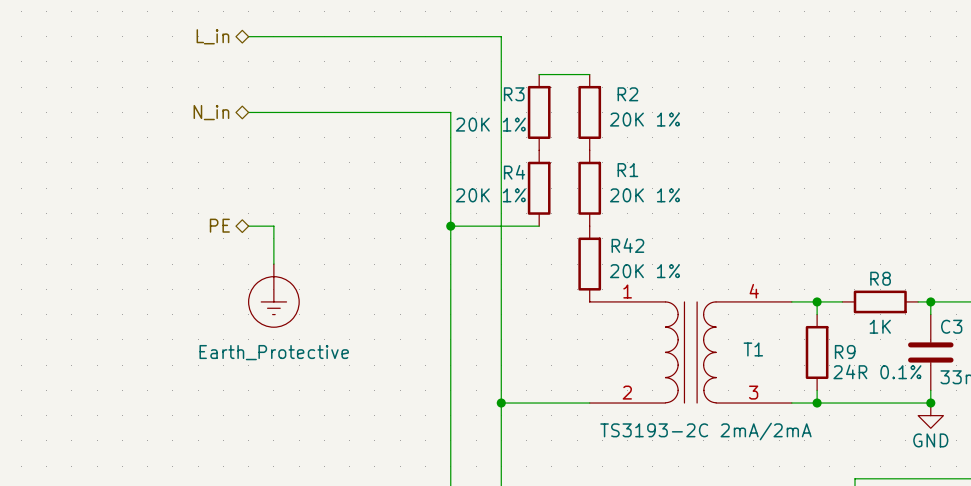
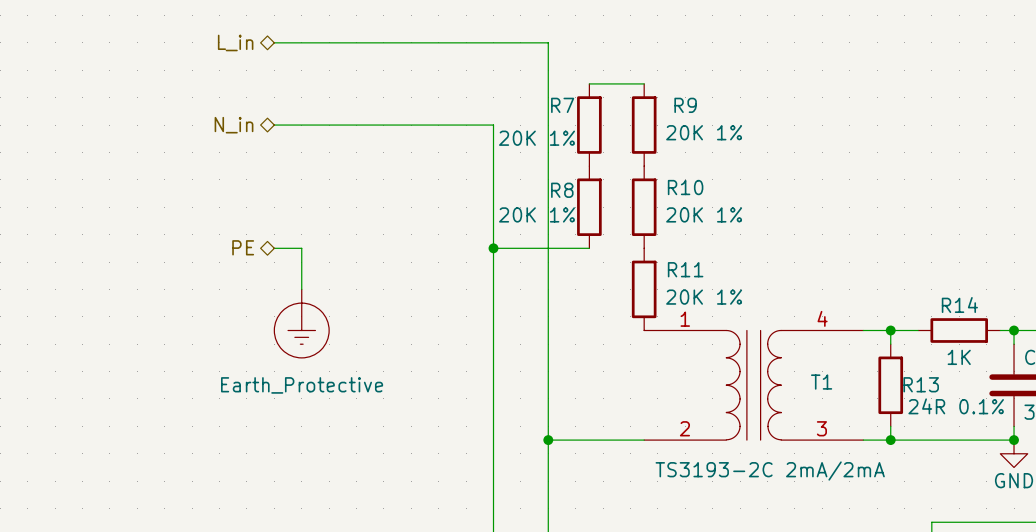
R3 name: R3 (514, 94) -> R7 (562, 105)
R2 name: R2 (627, 94) -> R9 (685, 105)
R1 name: R1 (627, 170) -> R10 (685, 187)
R4 name: R4 (514, 172) -> R8 (562, 190)
R42 name: R42 (627, 245) -> R11 (685, 269)
R8 name: R8 (880, 278) -> R14 (959, 305)
R9 name: R9 (845, 352) -> R13 (921, 384)

